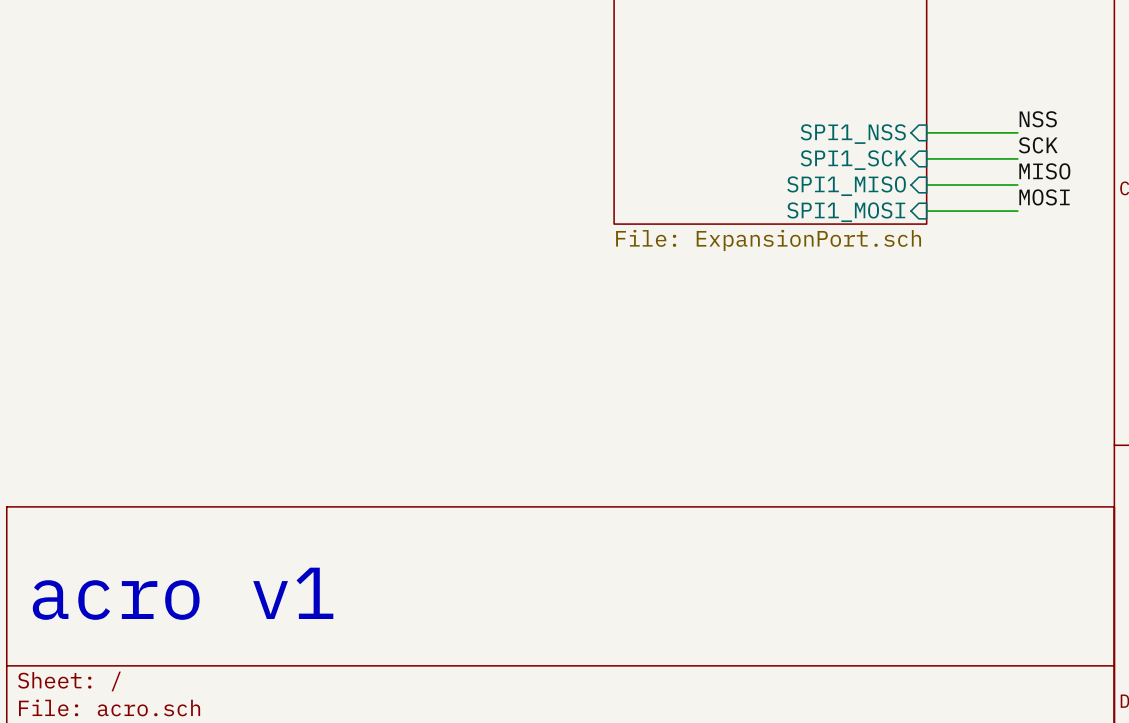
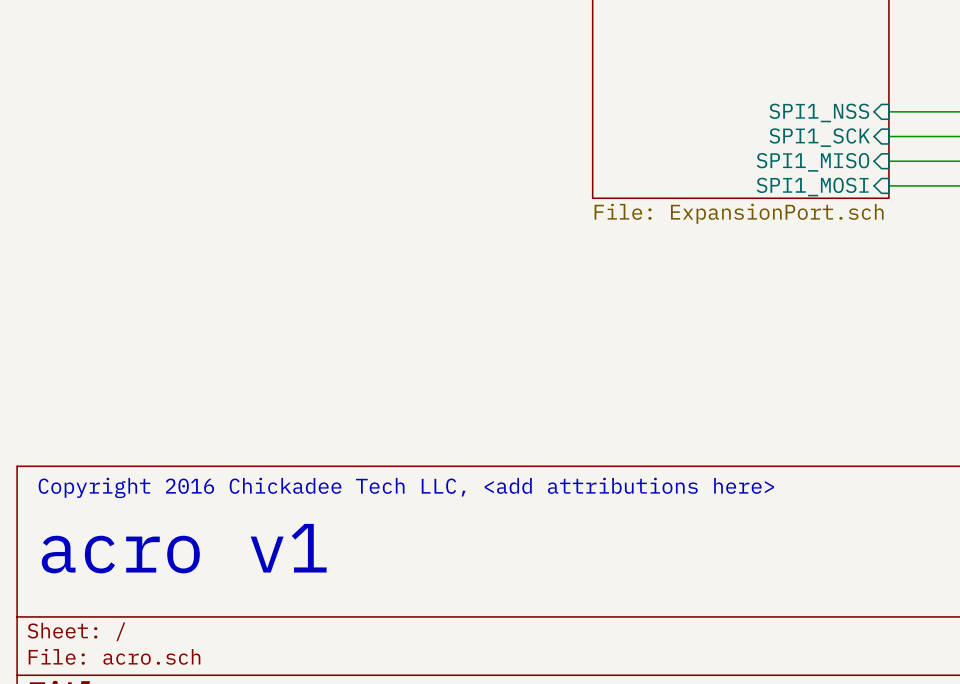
text: none -> Copyright 2016 Chickadee Tech LLC, <add attributions here> (406, 487)

